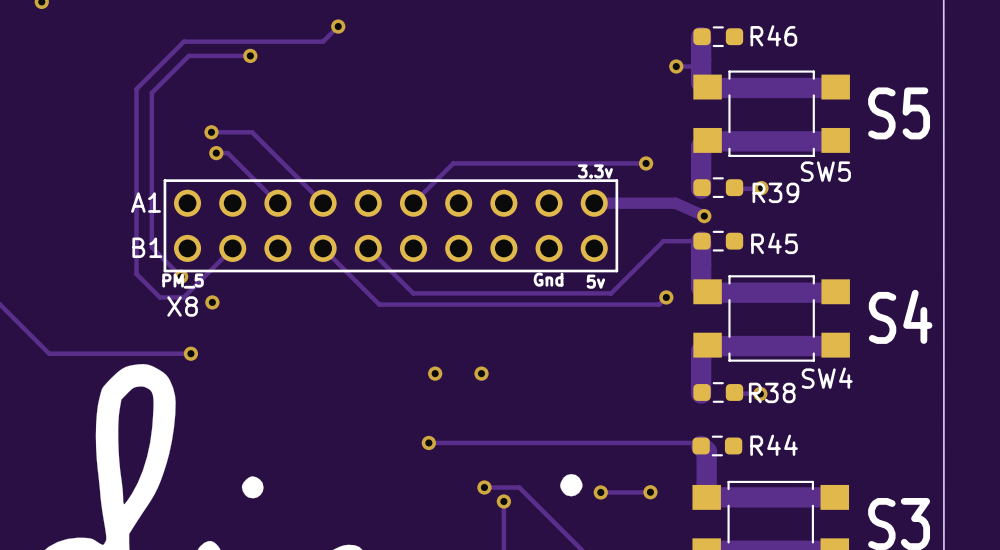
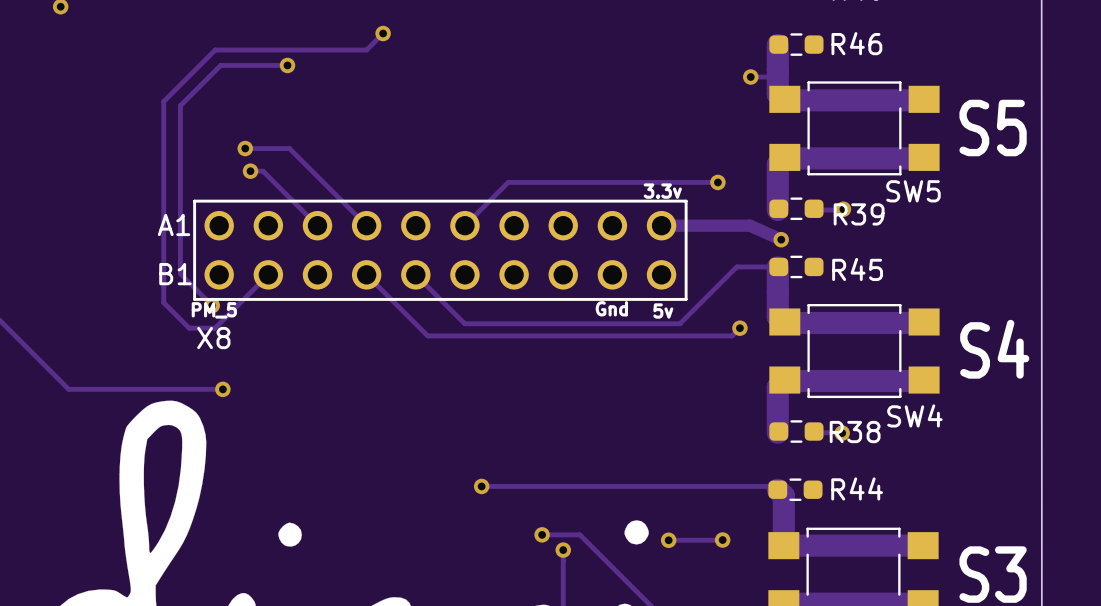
via: (212, 302) -> none
via: (435, 373) -> none
via: (481, 373) -> none

